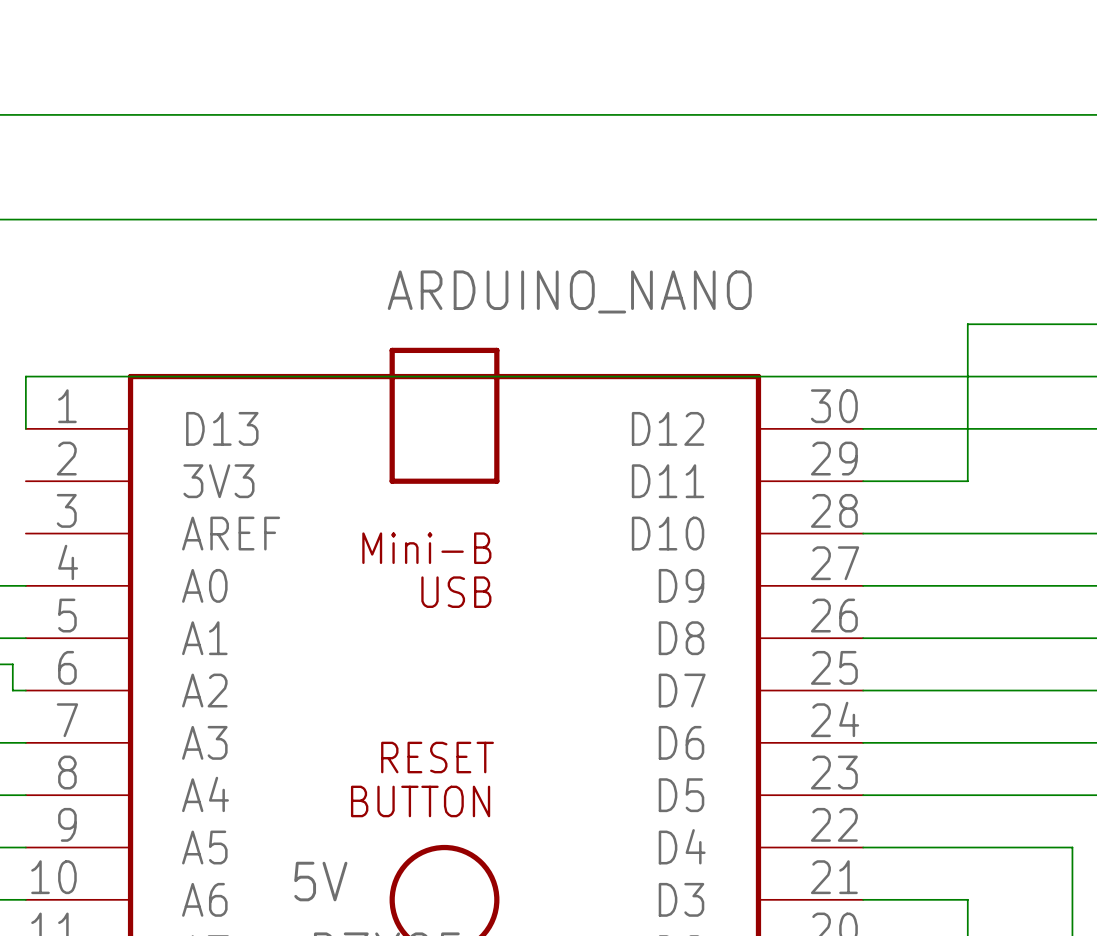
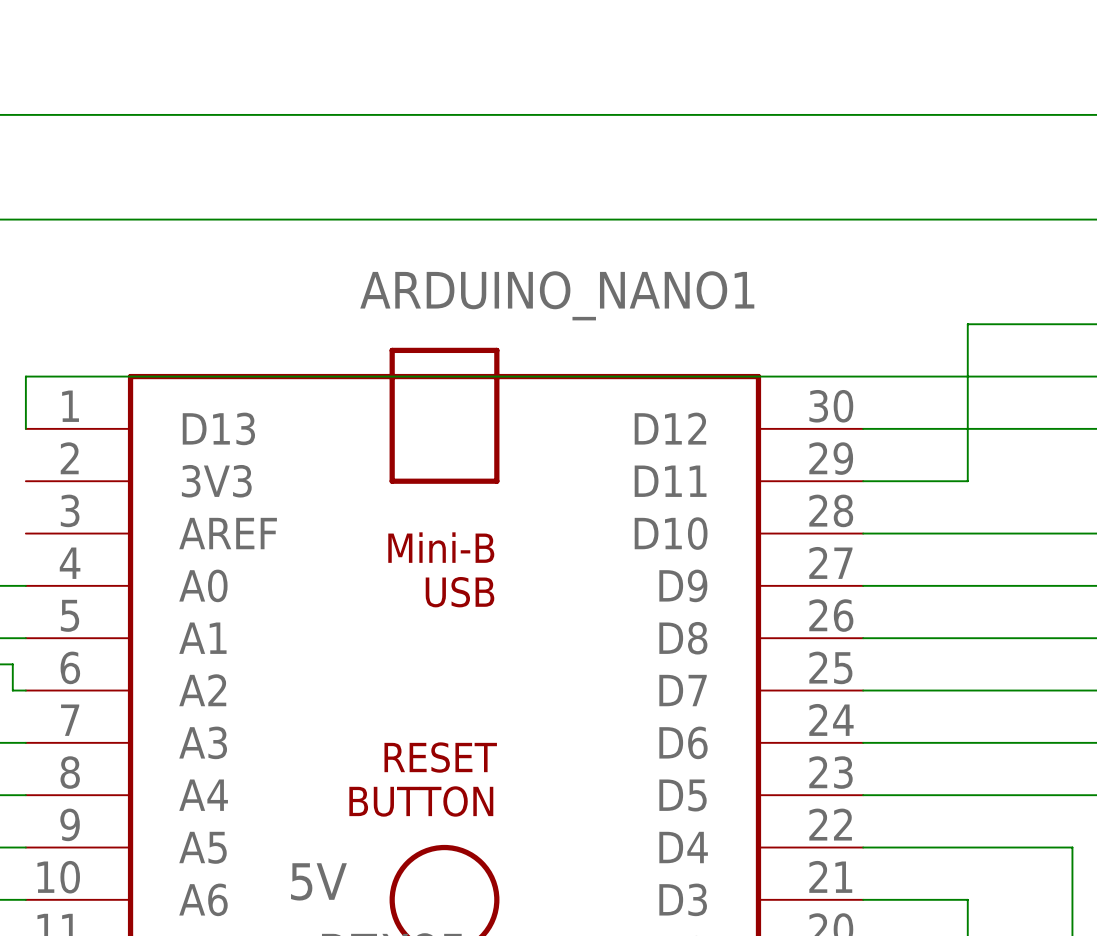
ARDUINO_NANO name: ARDUINO_NANO (569, 291) -> ARDUINO_NANO1 (557, 295)

